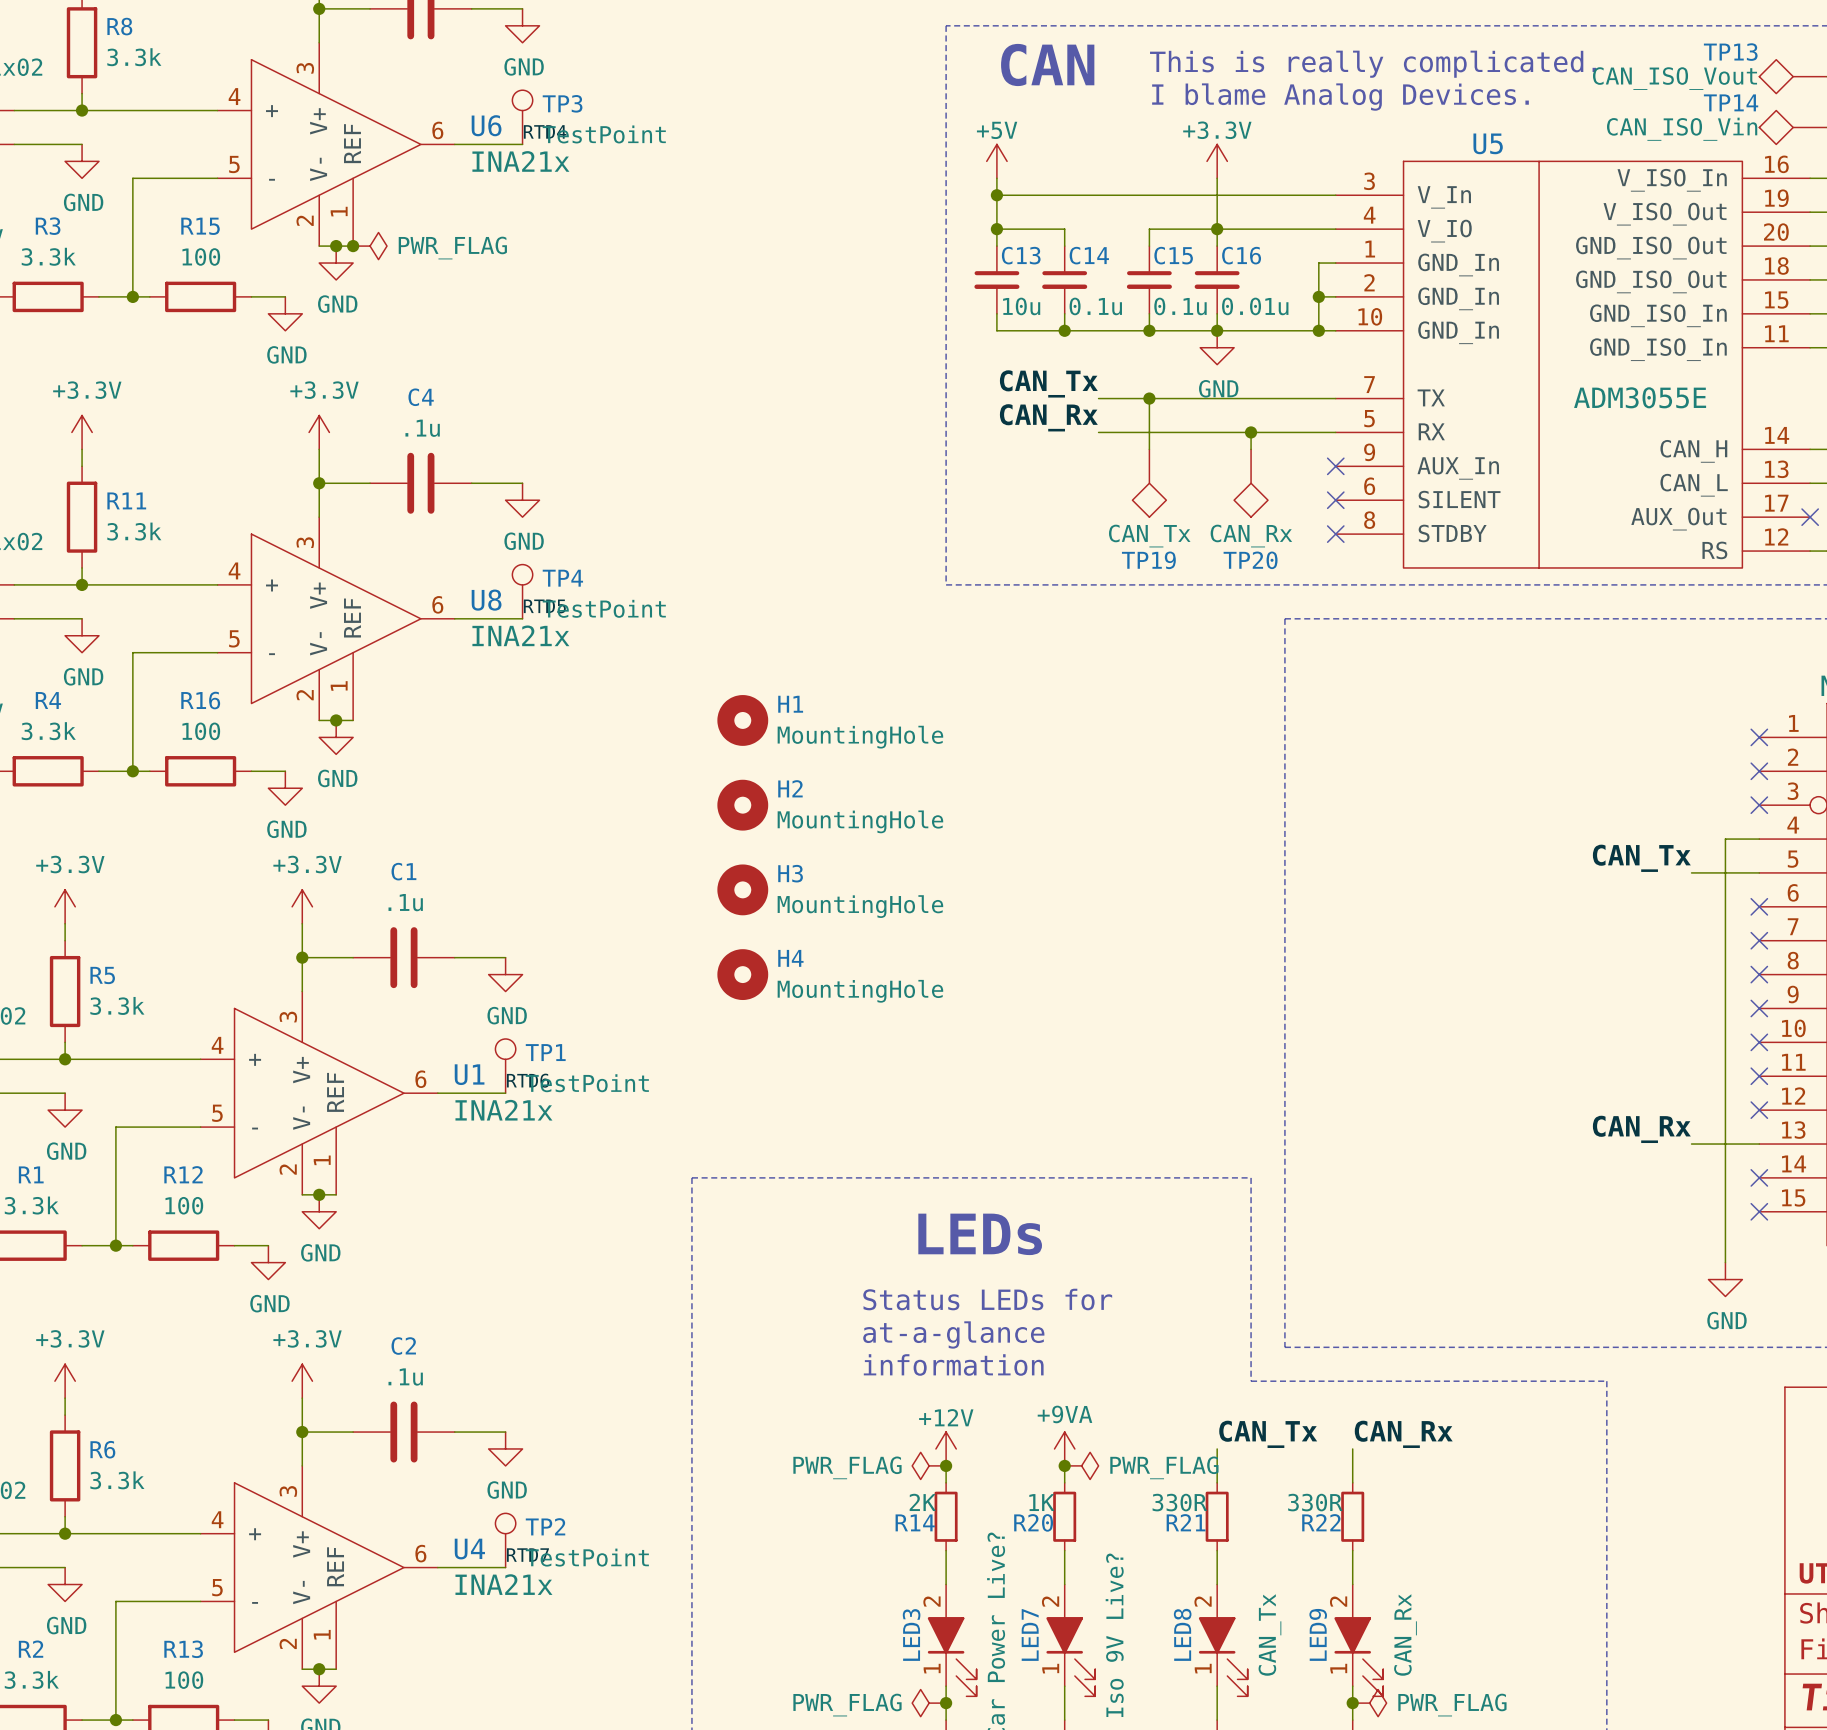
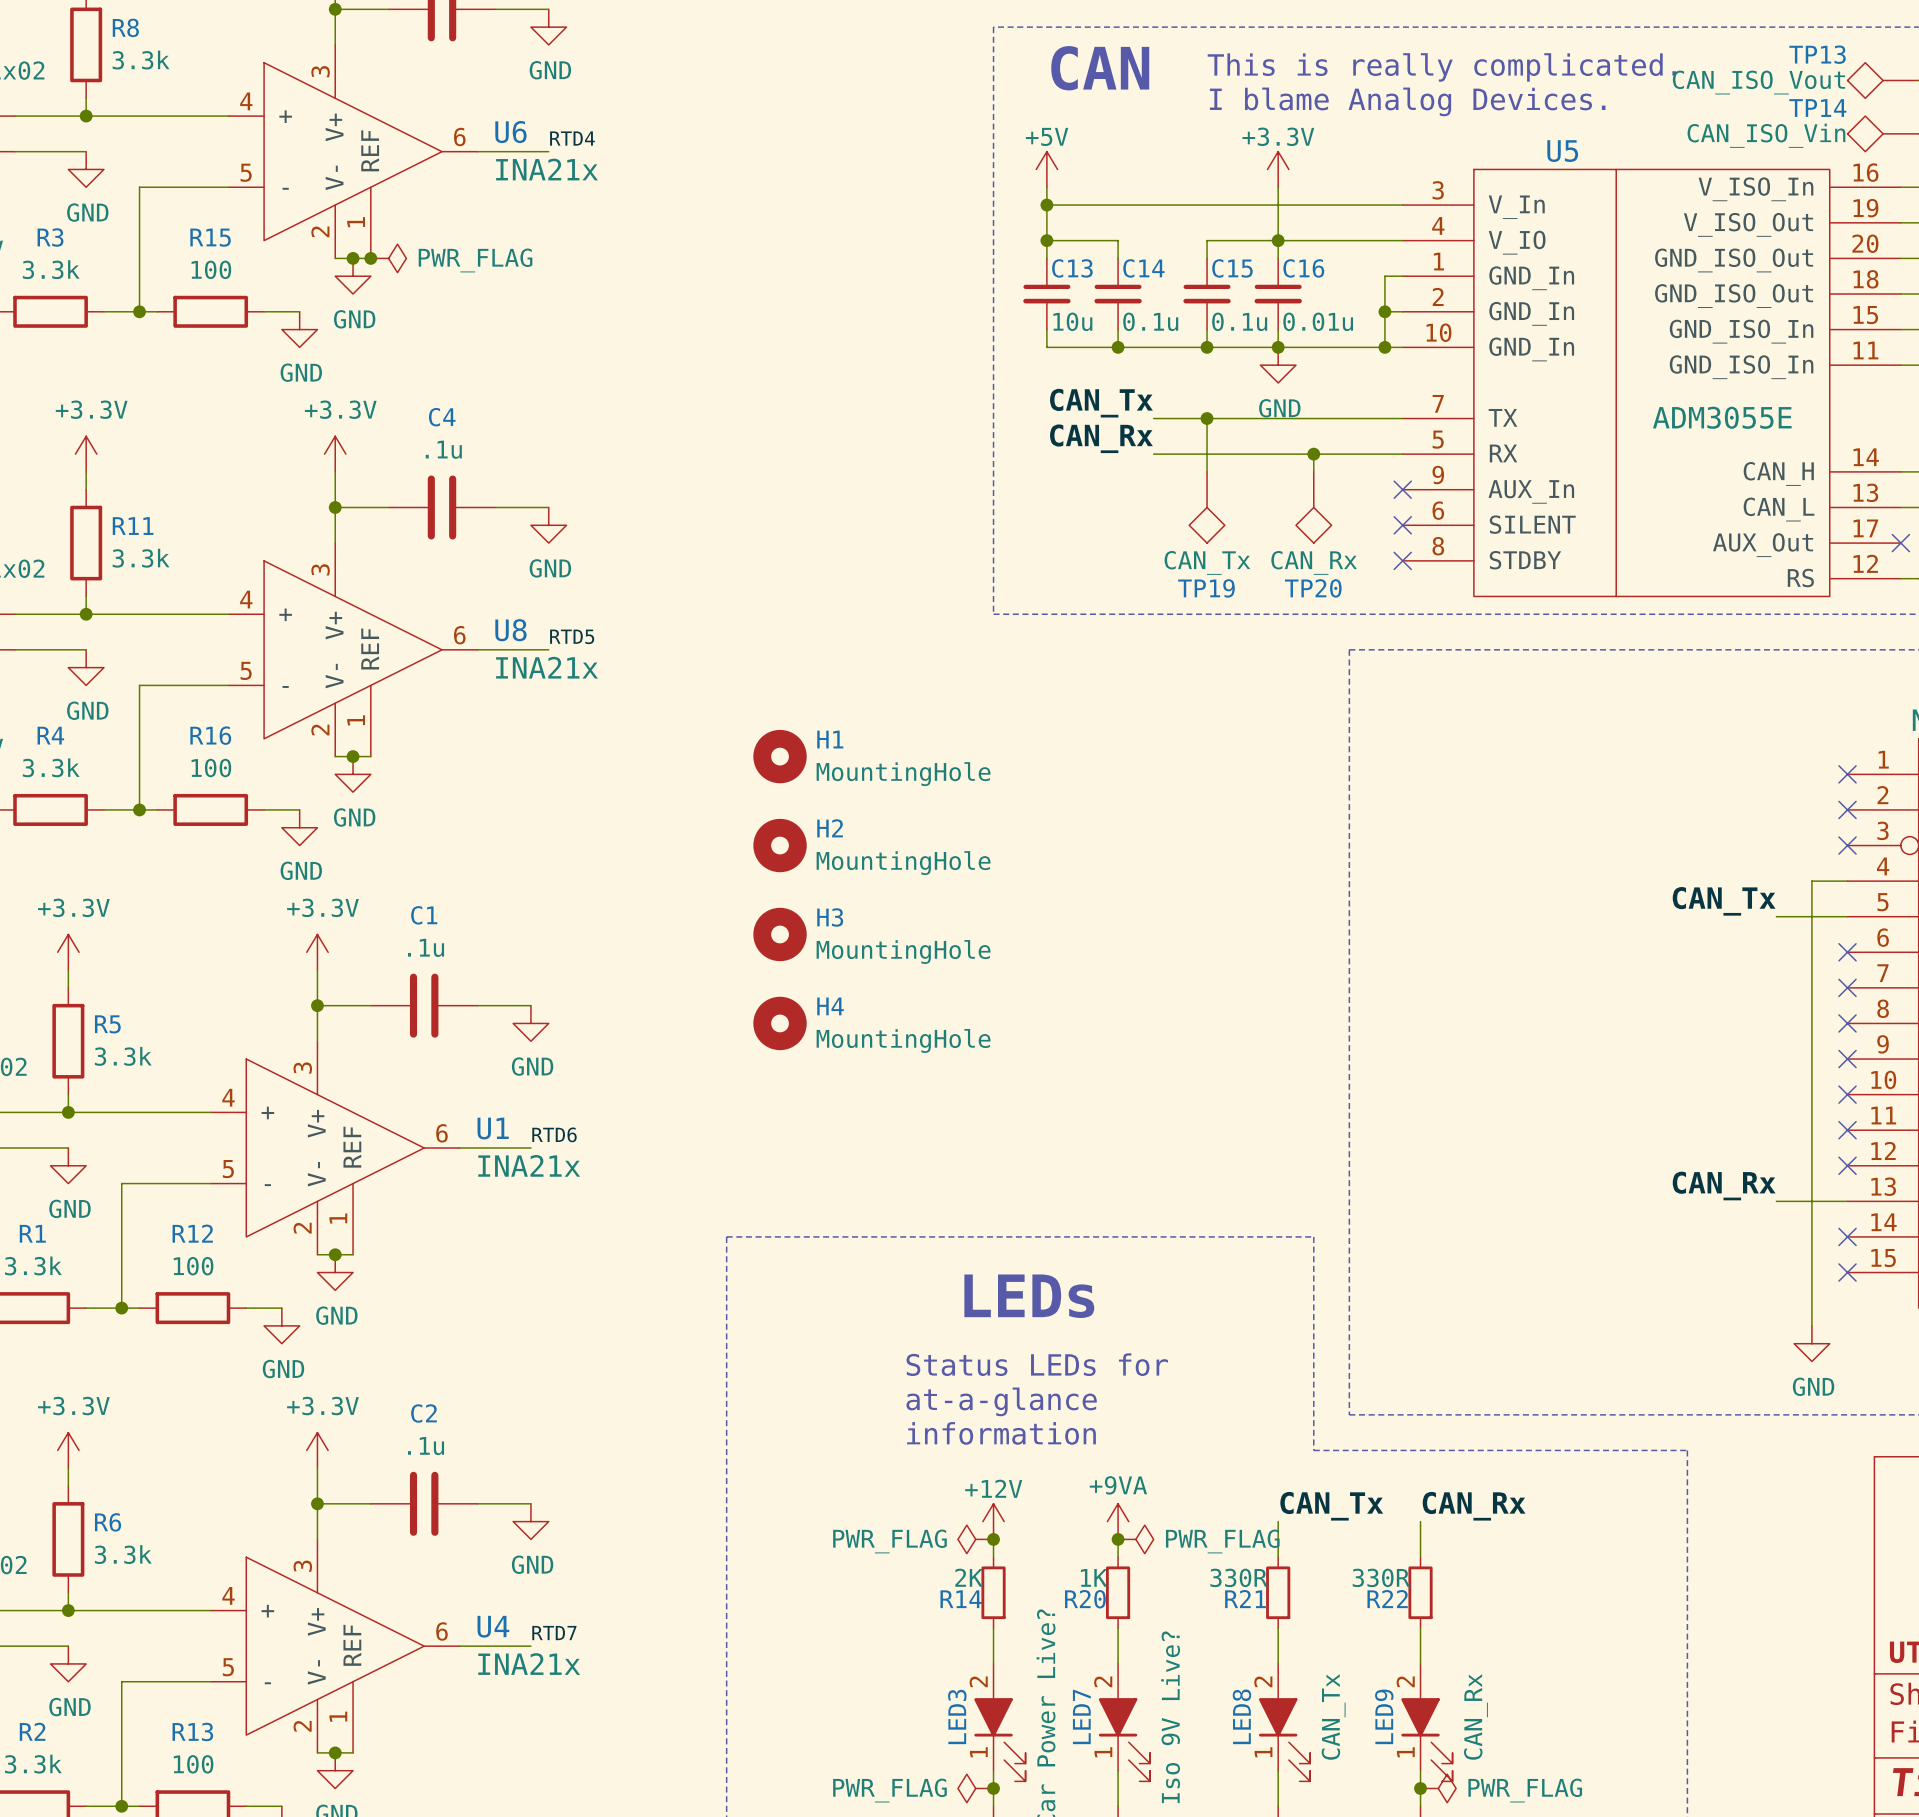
TP3: TestPoint (522, 117) -> none
TP4: TestPoint (522, 591) -> none
TP1: TestPoint (505, 1066) -> none
TP2: TestPoint (505, 1540) -> none

